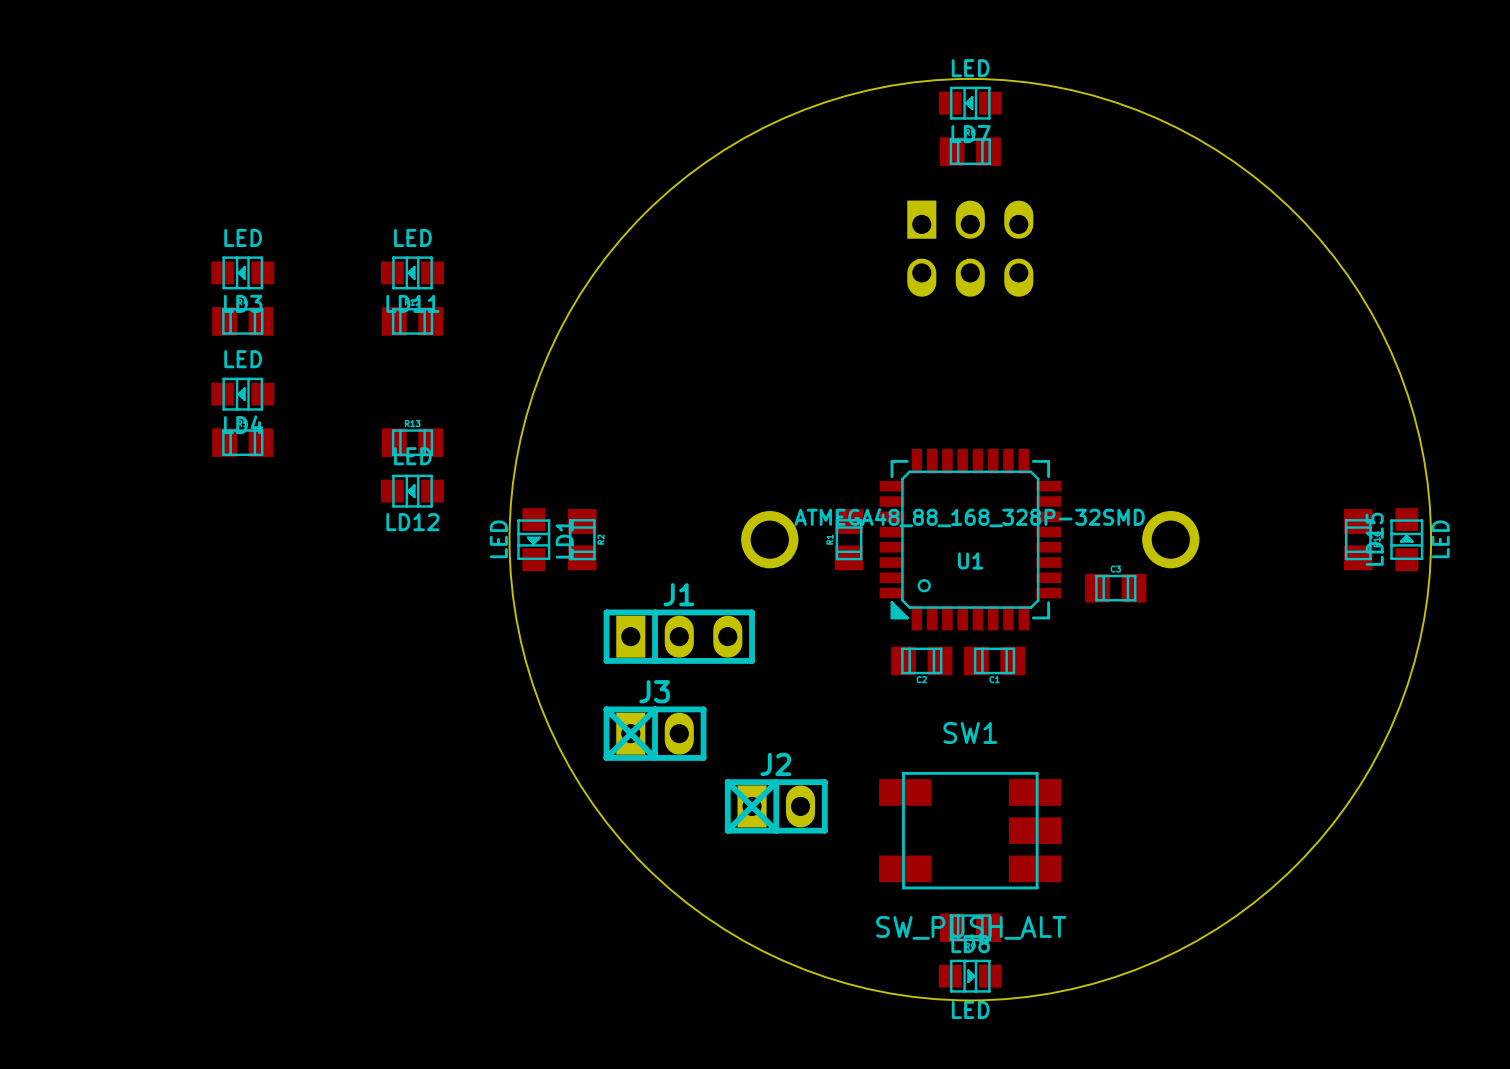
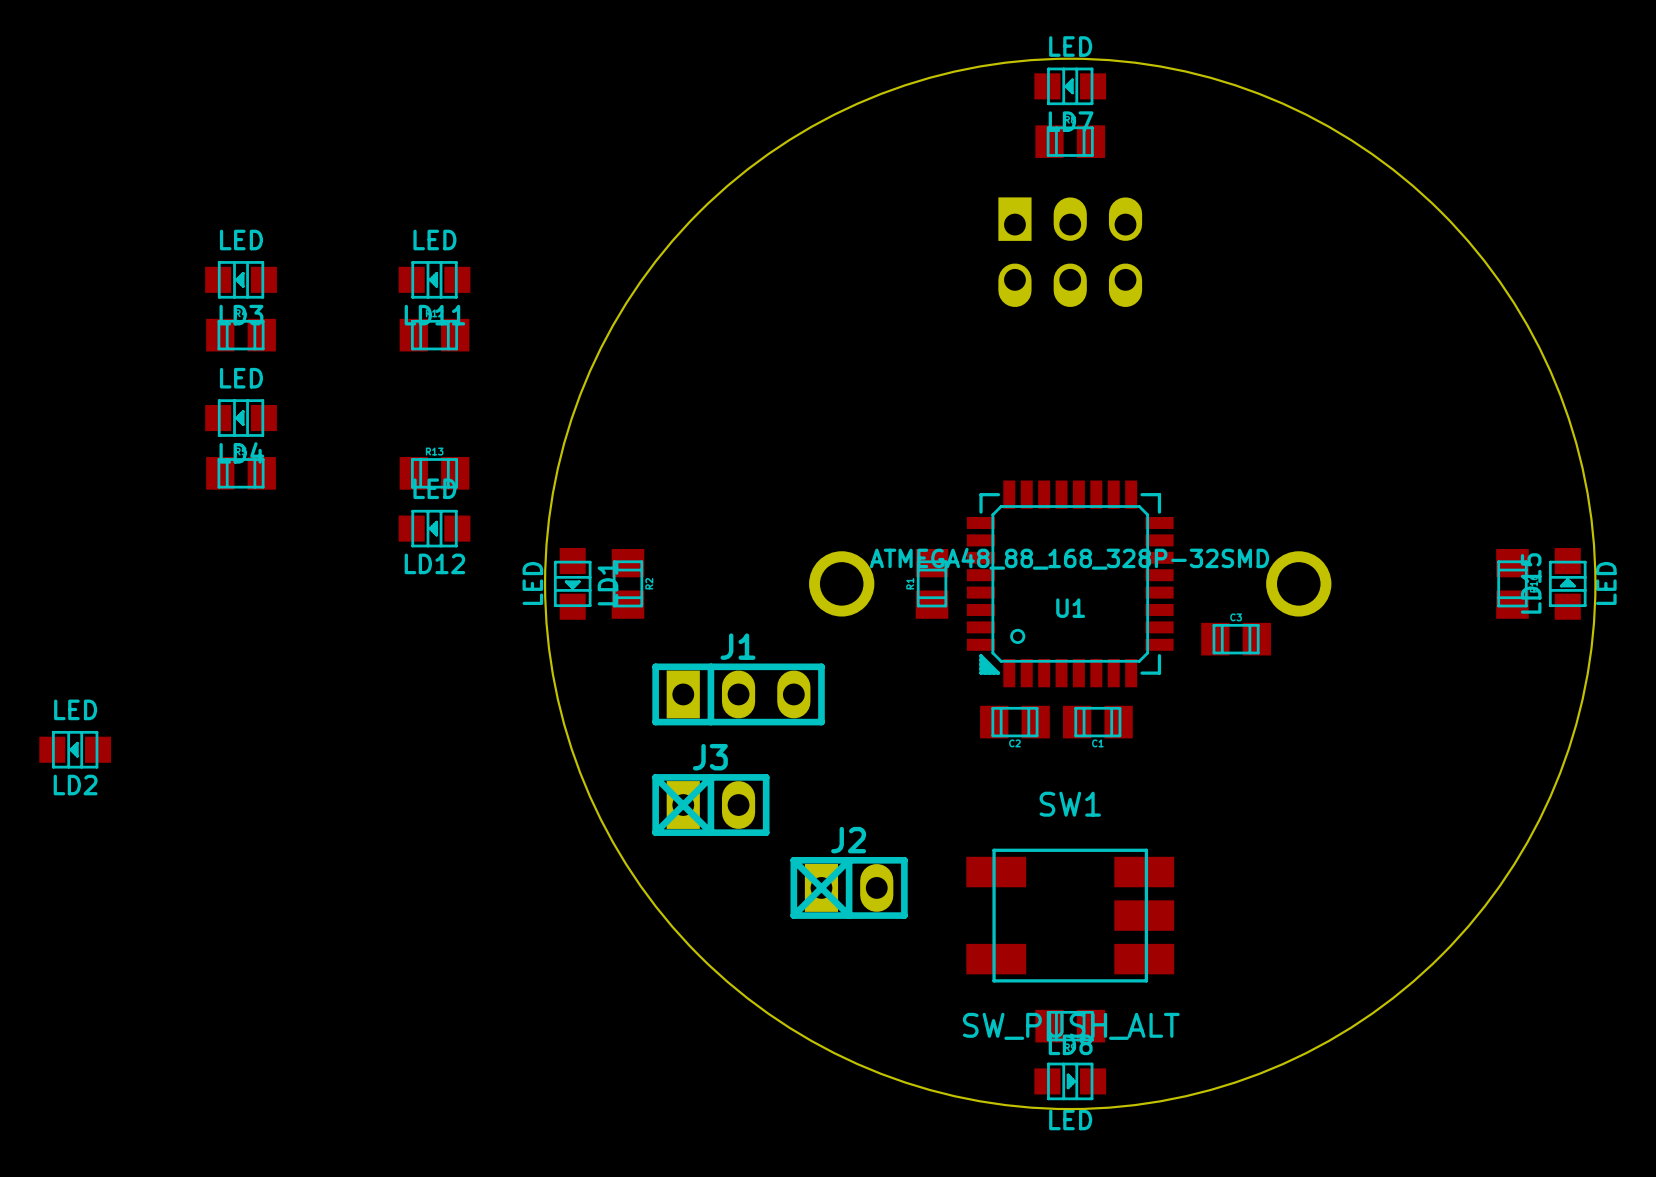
LD2: none -> LED (75, 749)

